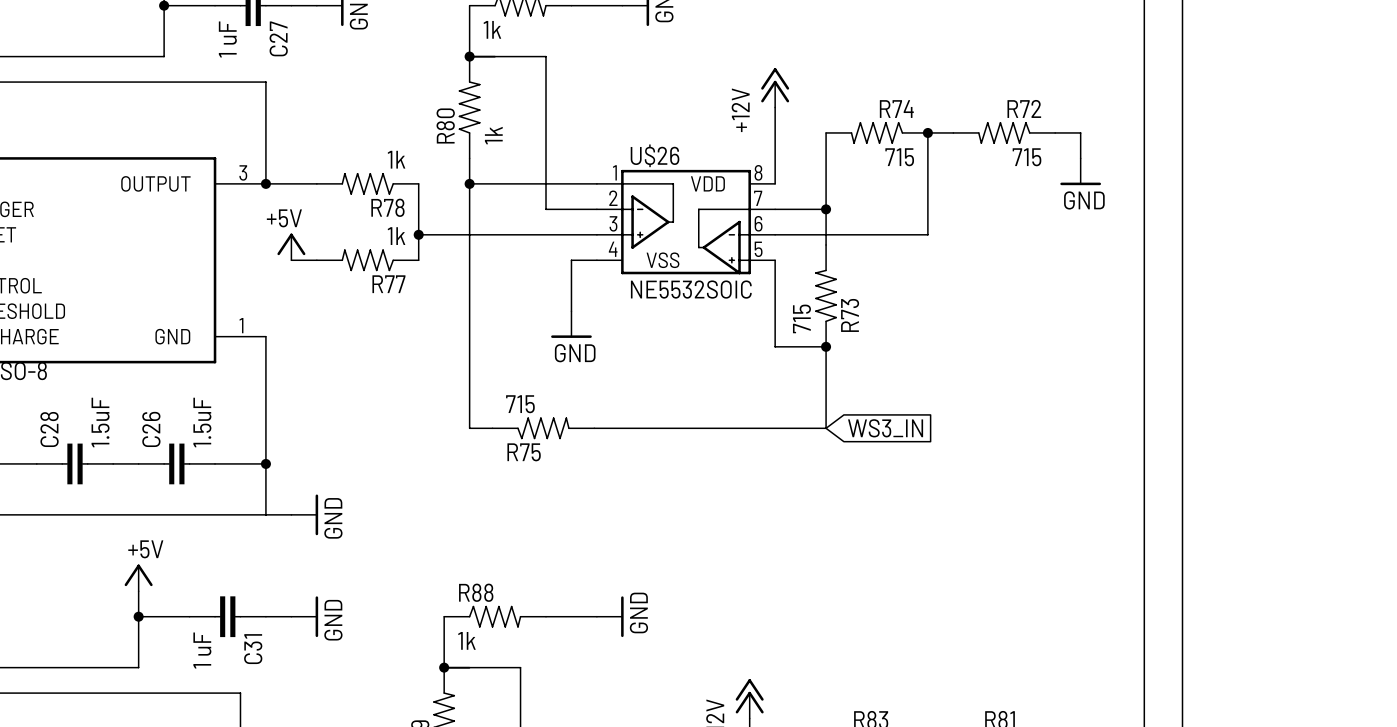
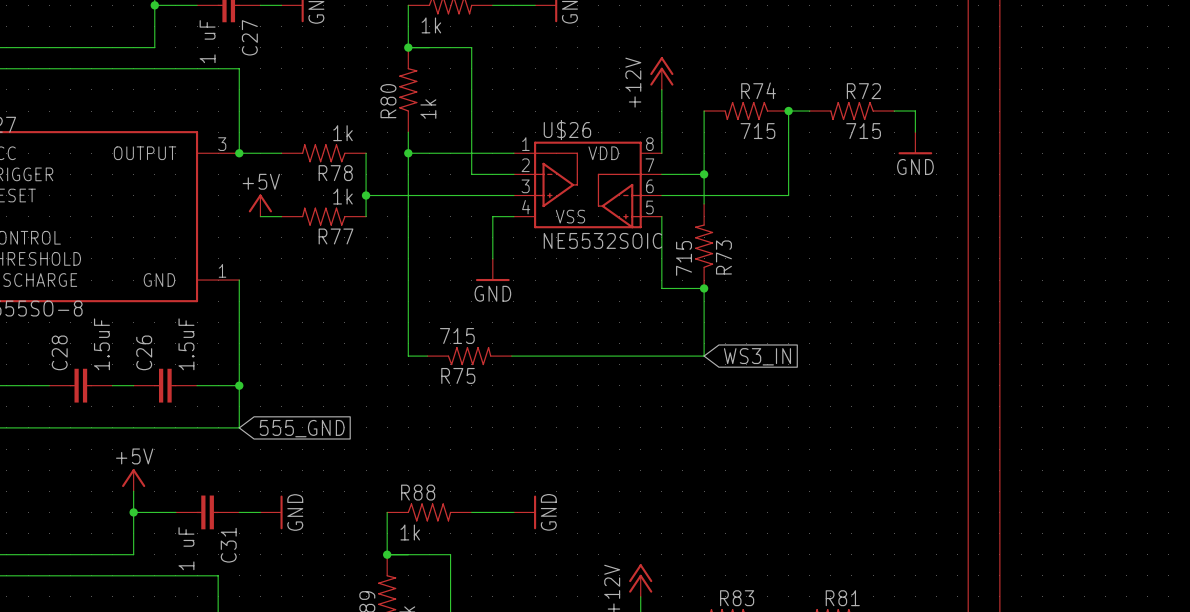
wire: (265, 514) (291, 514) -> none
power symbol: GND (304, 514) -> none
global label: none -> 555_GND (302, 428)

